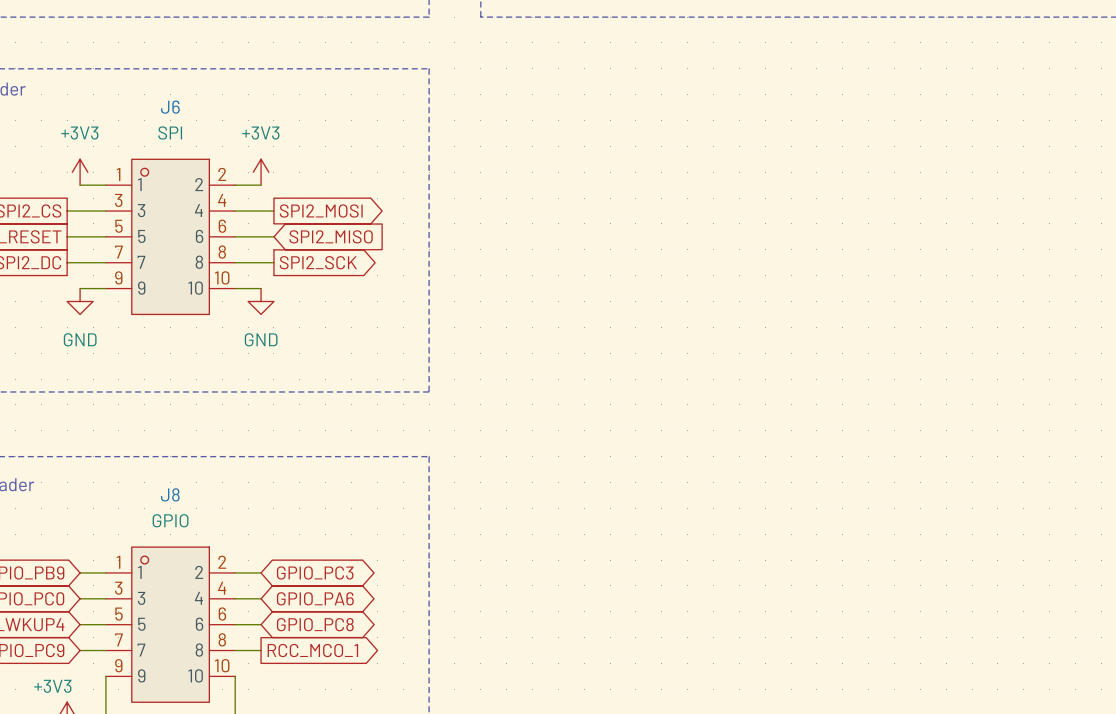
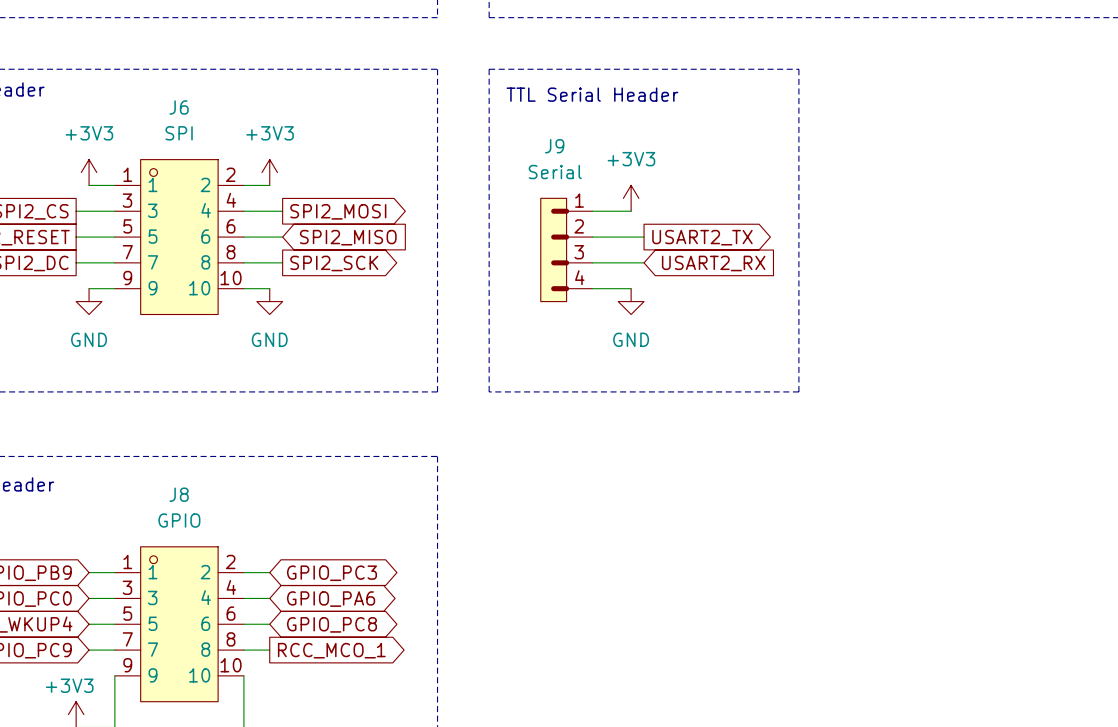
line: none -> (489, 69) (798, 69) (798, 391) (489, 391) (489, 69)
text: none -> TTL Serial Header (592, 94)
power symbol: none -> +3V3 (631, 198)
wire: none -> (592, 211) (631, 211)
wire: none -> (592, 237) (644, 237)
global label: none -> USART2_TX (702, 237)
J9: none -> Serial (566, 249)
wire: none -> (592, 262) (644, 262)
global label: none -> USART2_RX (713, 263)
wire: none -> (592, 288) (631, 288)
power symbol: none -> GND (631, 301)

